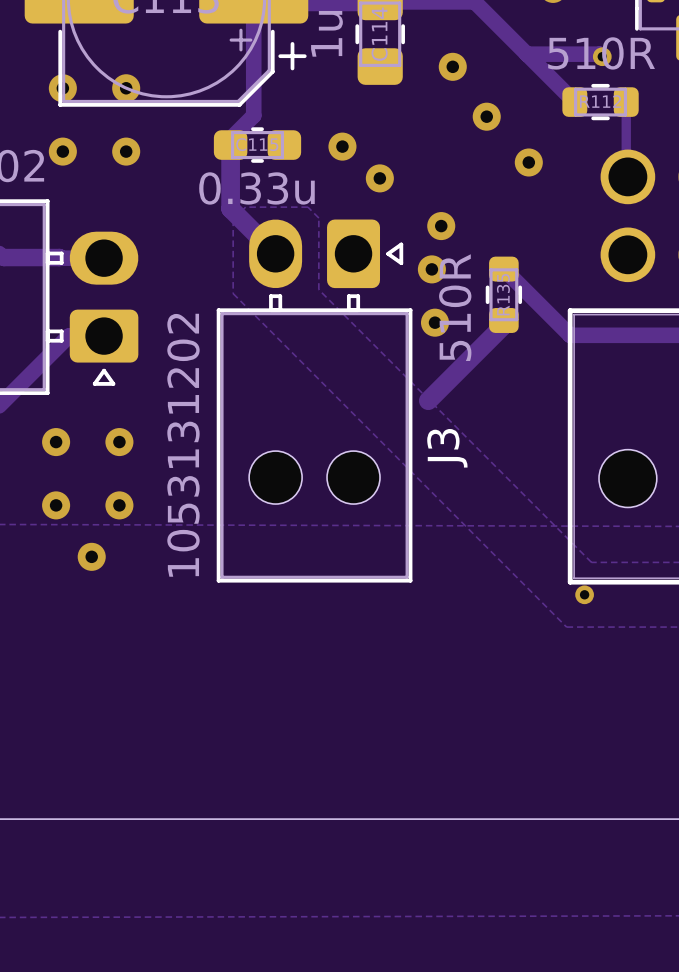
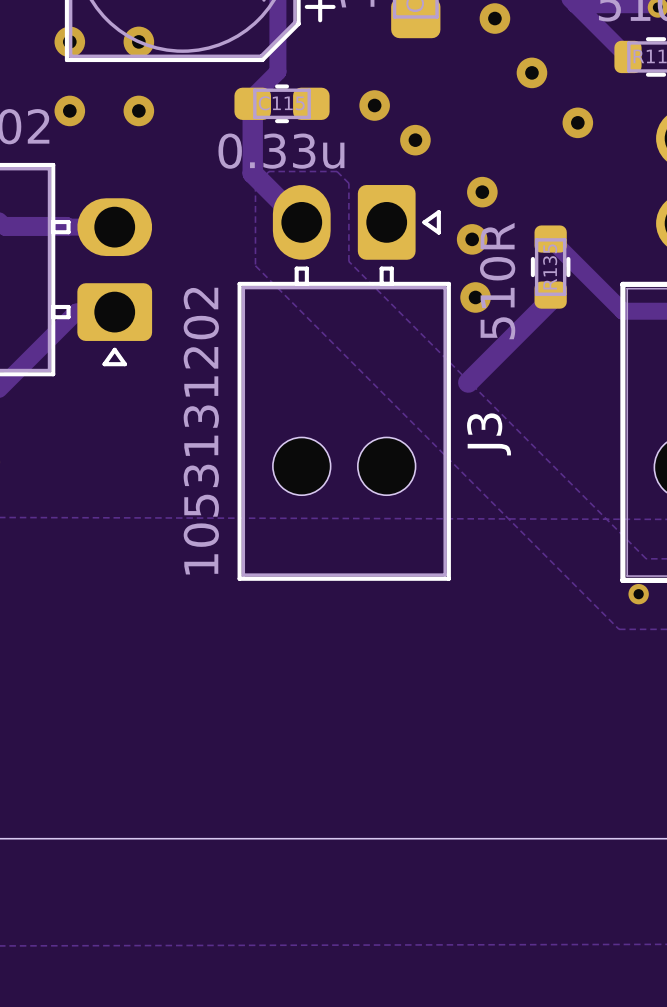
via: (56, 442) -> none
via: (119, 442) -> none
via: (56, 505) -> none
via: (119, 505) -> none
via: (91, 556) -> none

